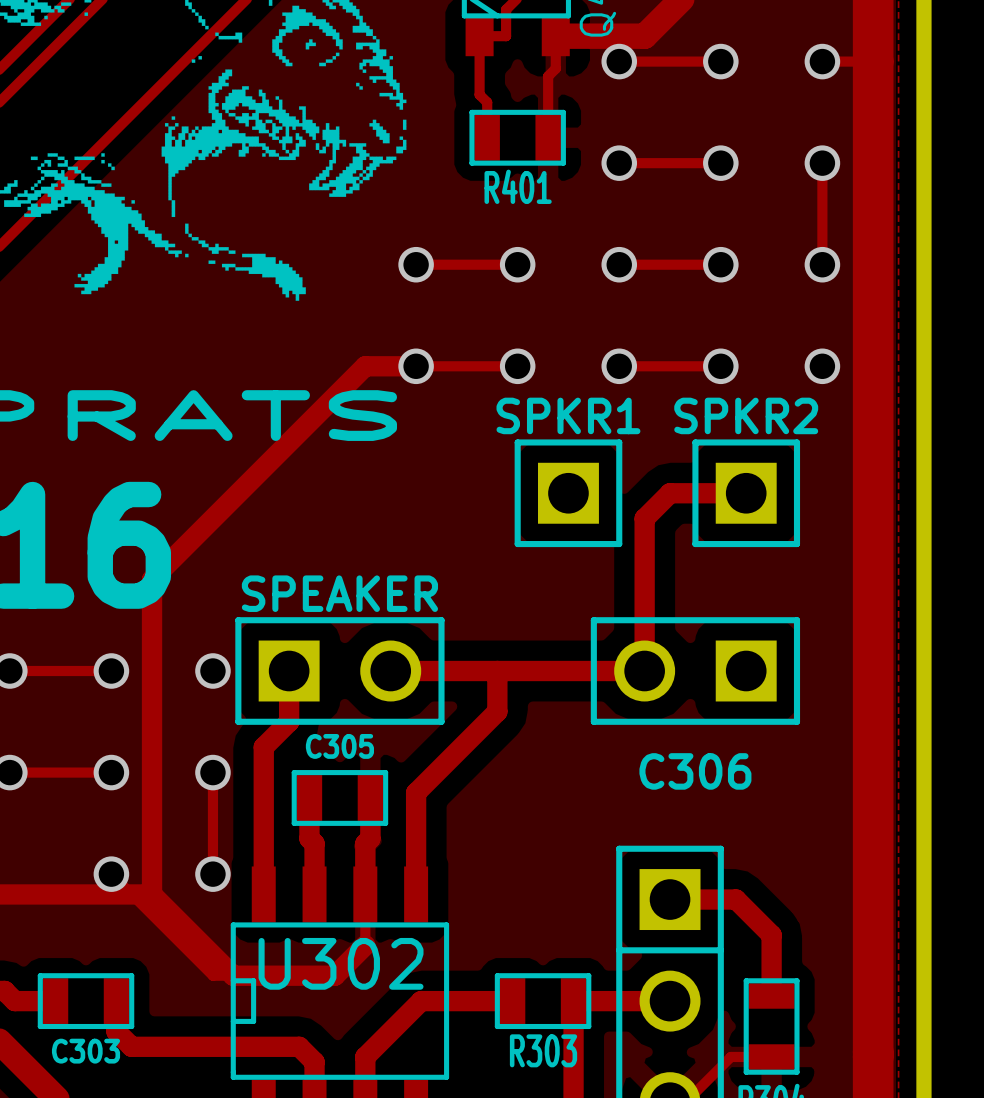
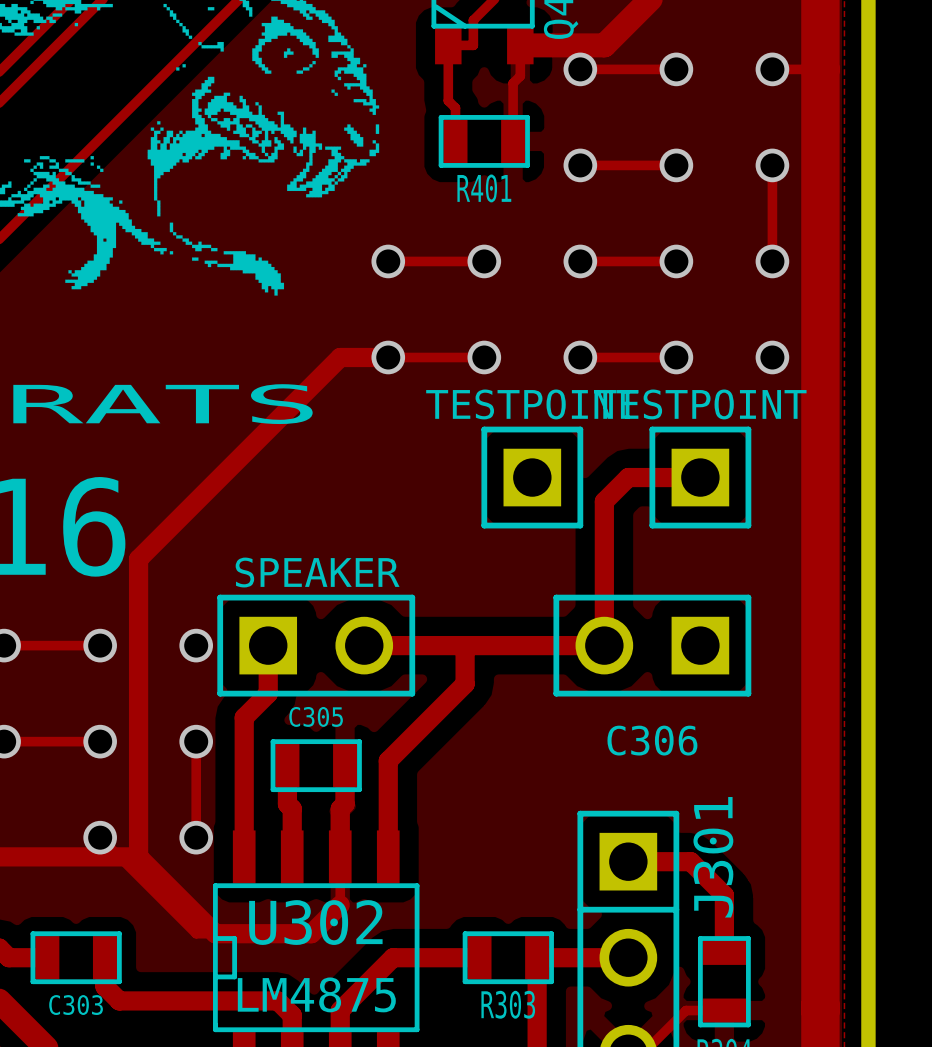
part value: SPKR1 (568, 415) -> TESTPOINT (532, 404)
part value: SPKR2 (746, 415) -> TESTPOINT (700, 404)
J301 name: none -> J301 (713, 857)
U302 value: none -> LM4875 (316, 994)

